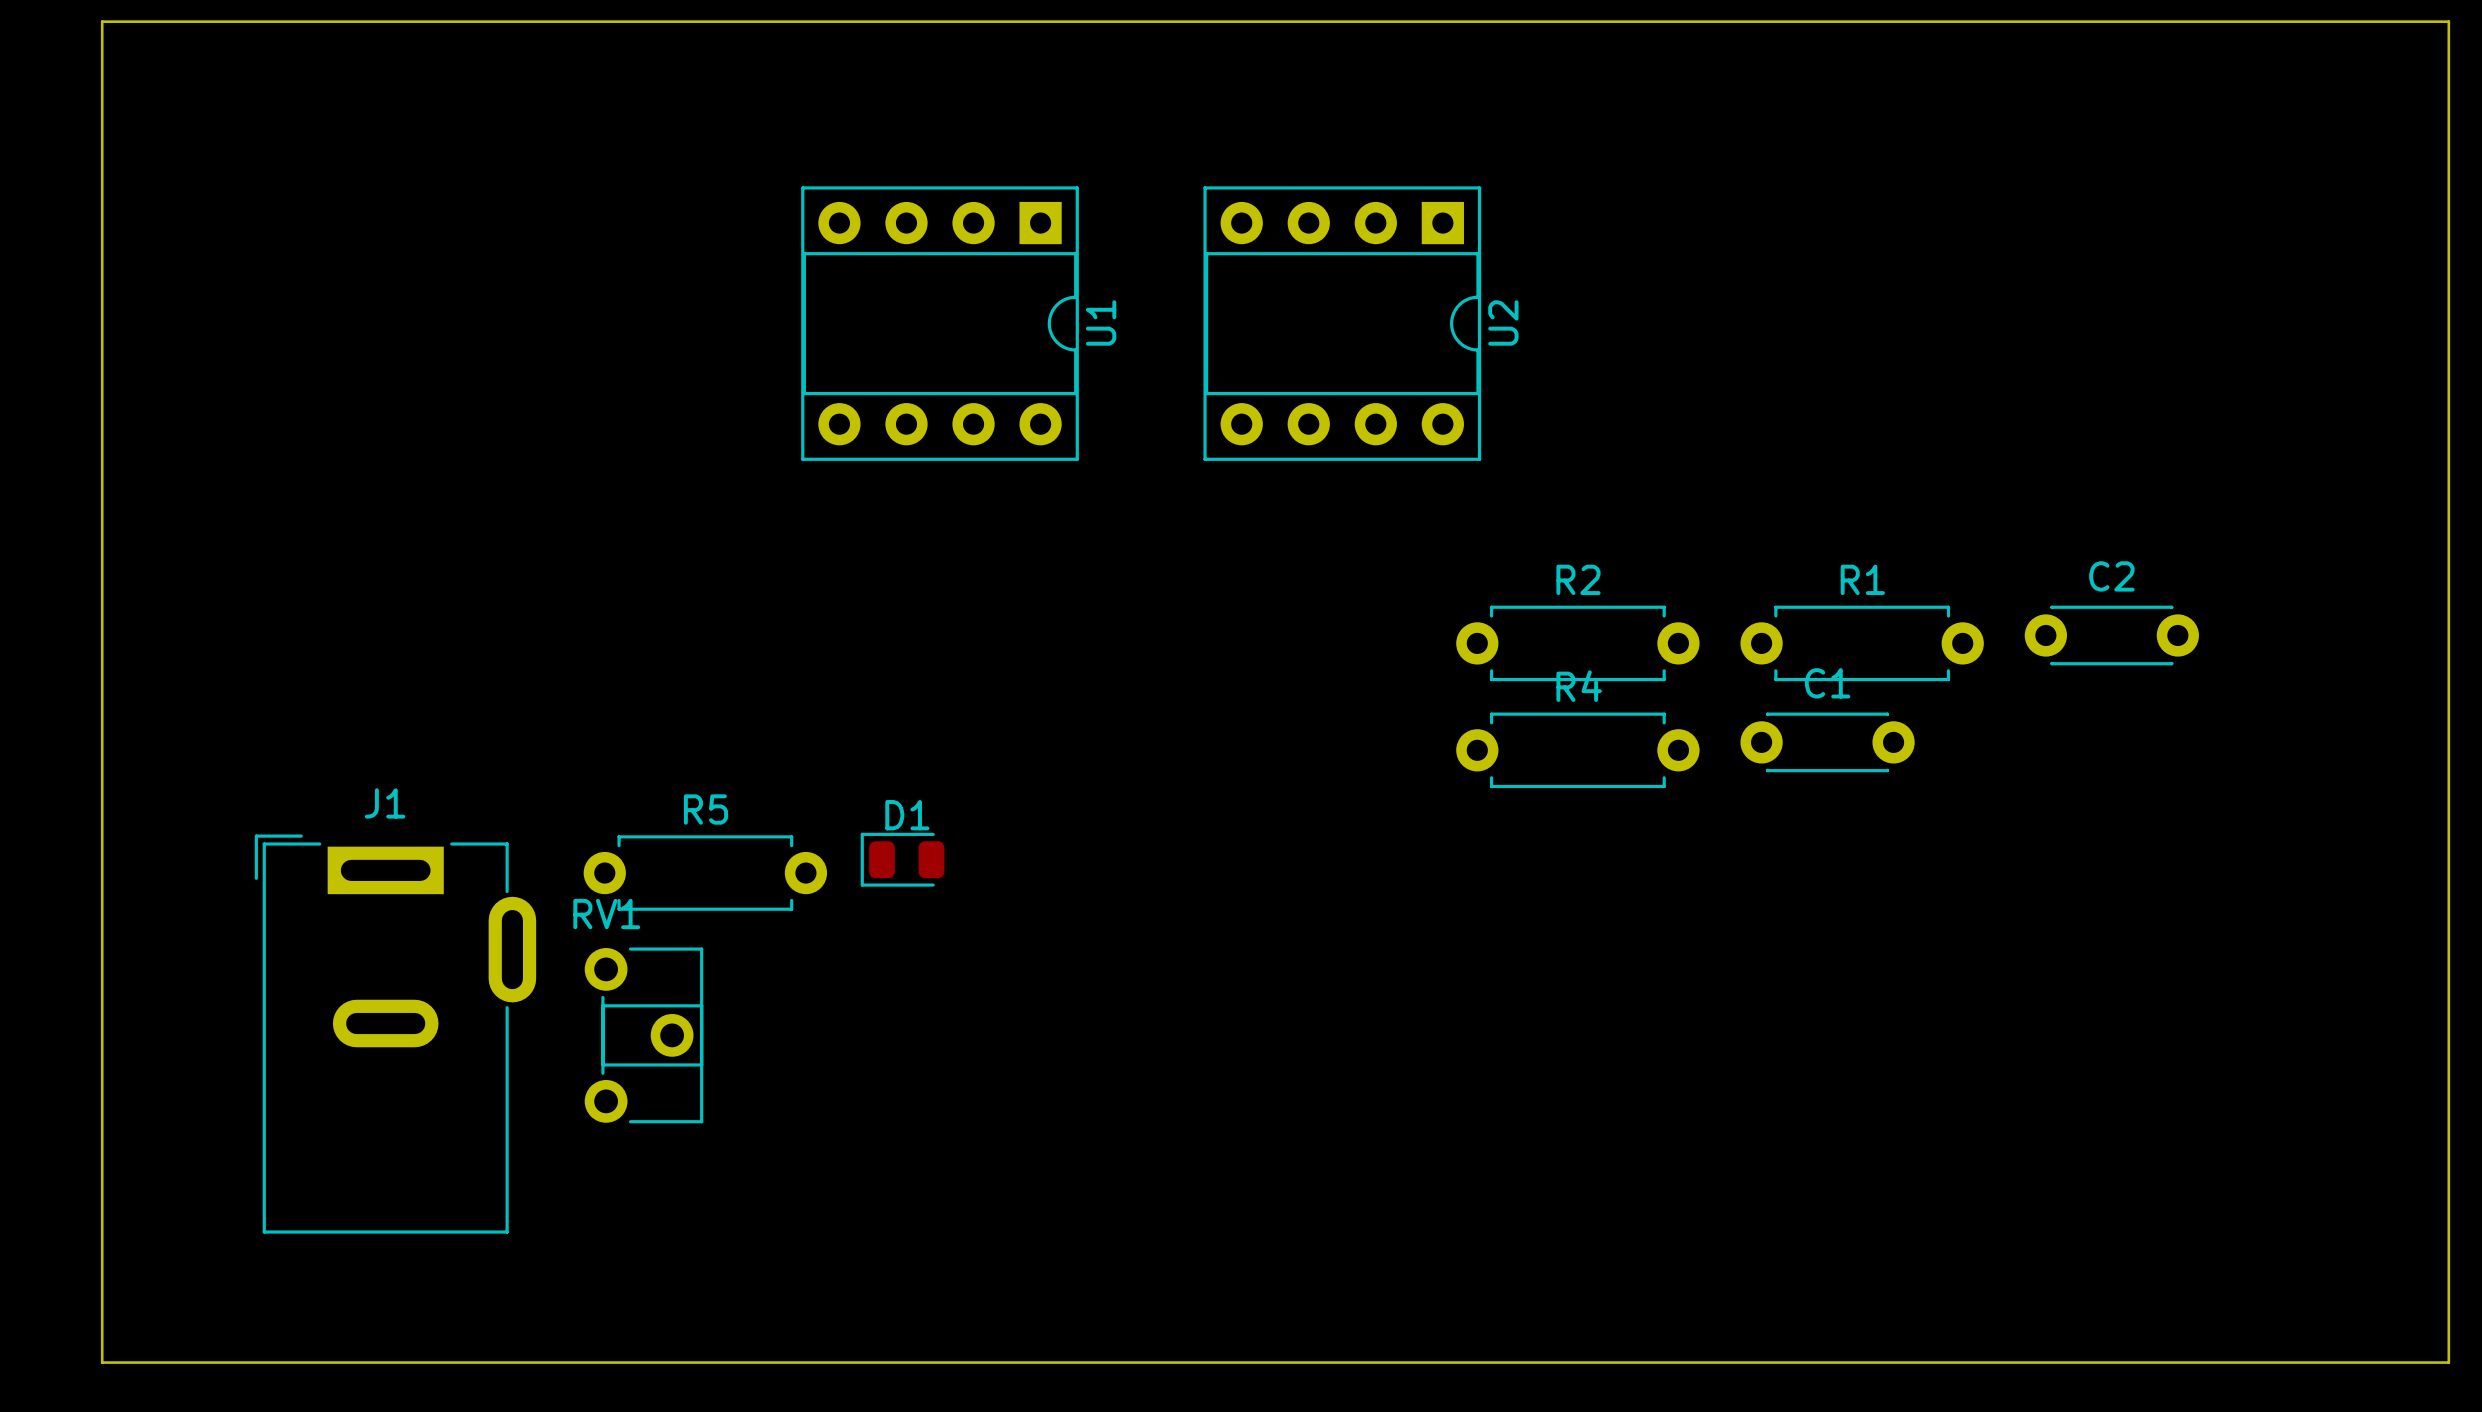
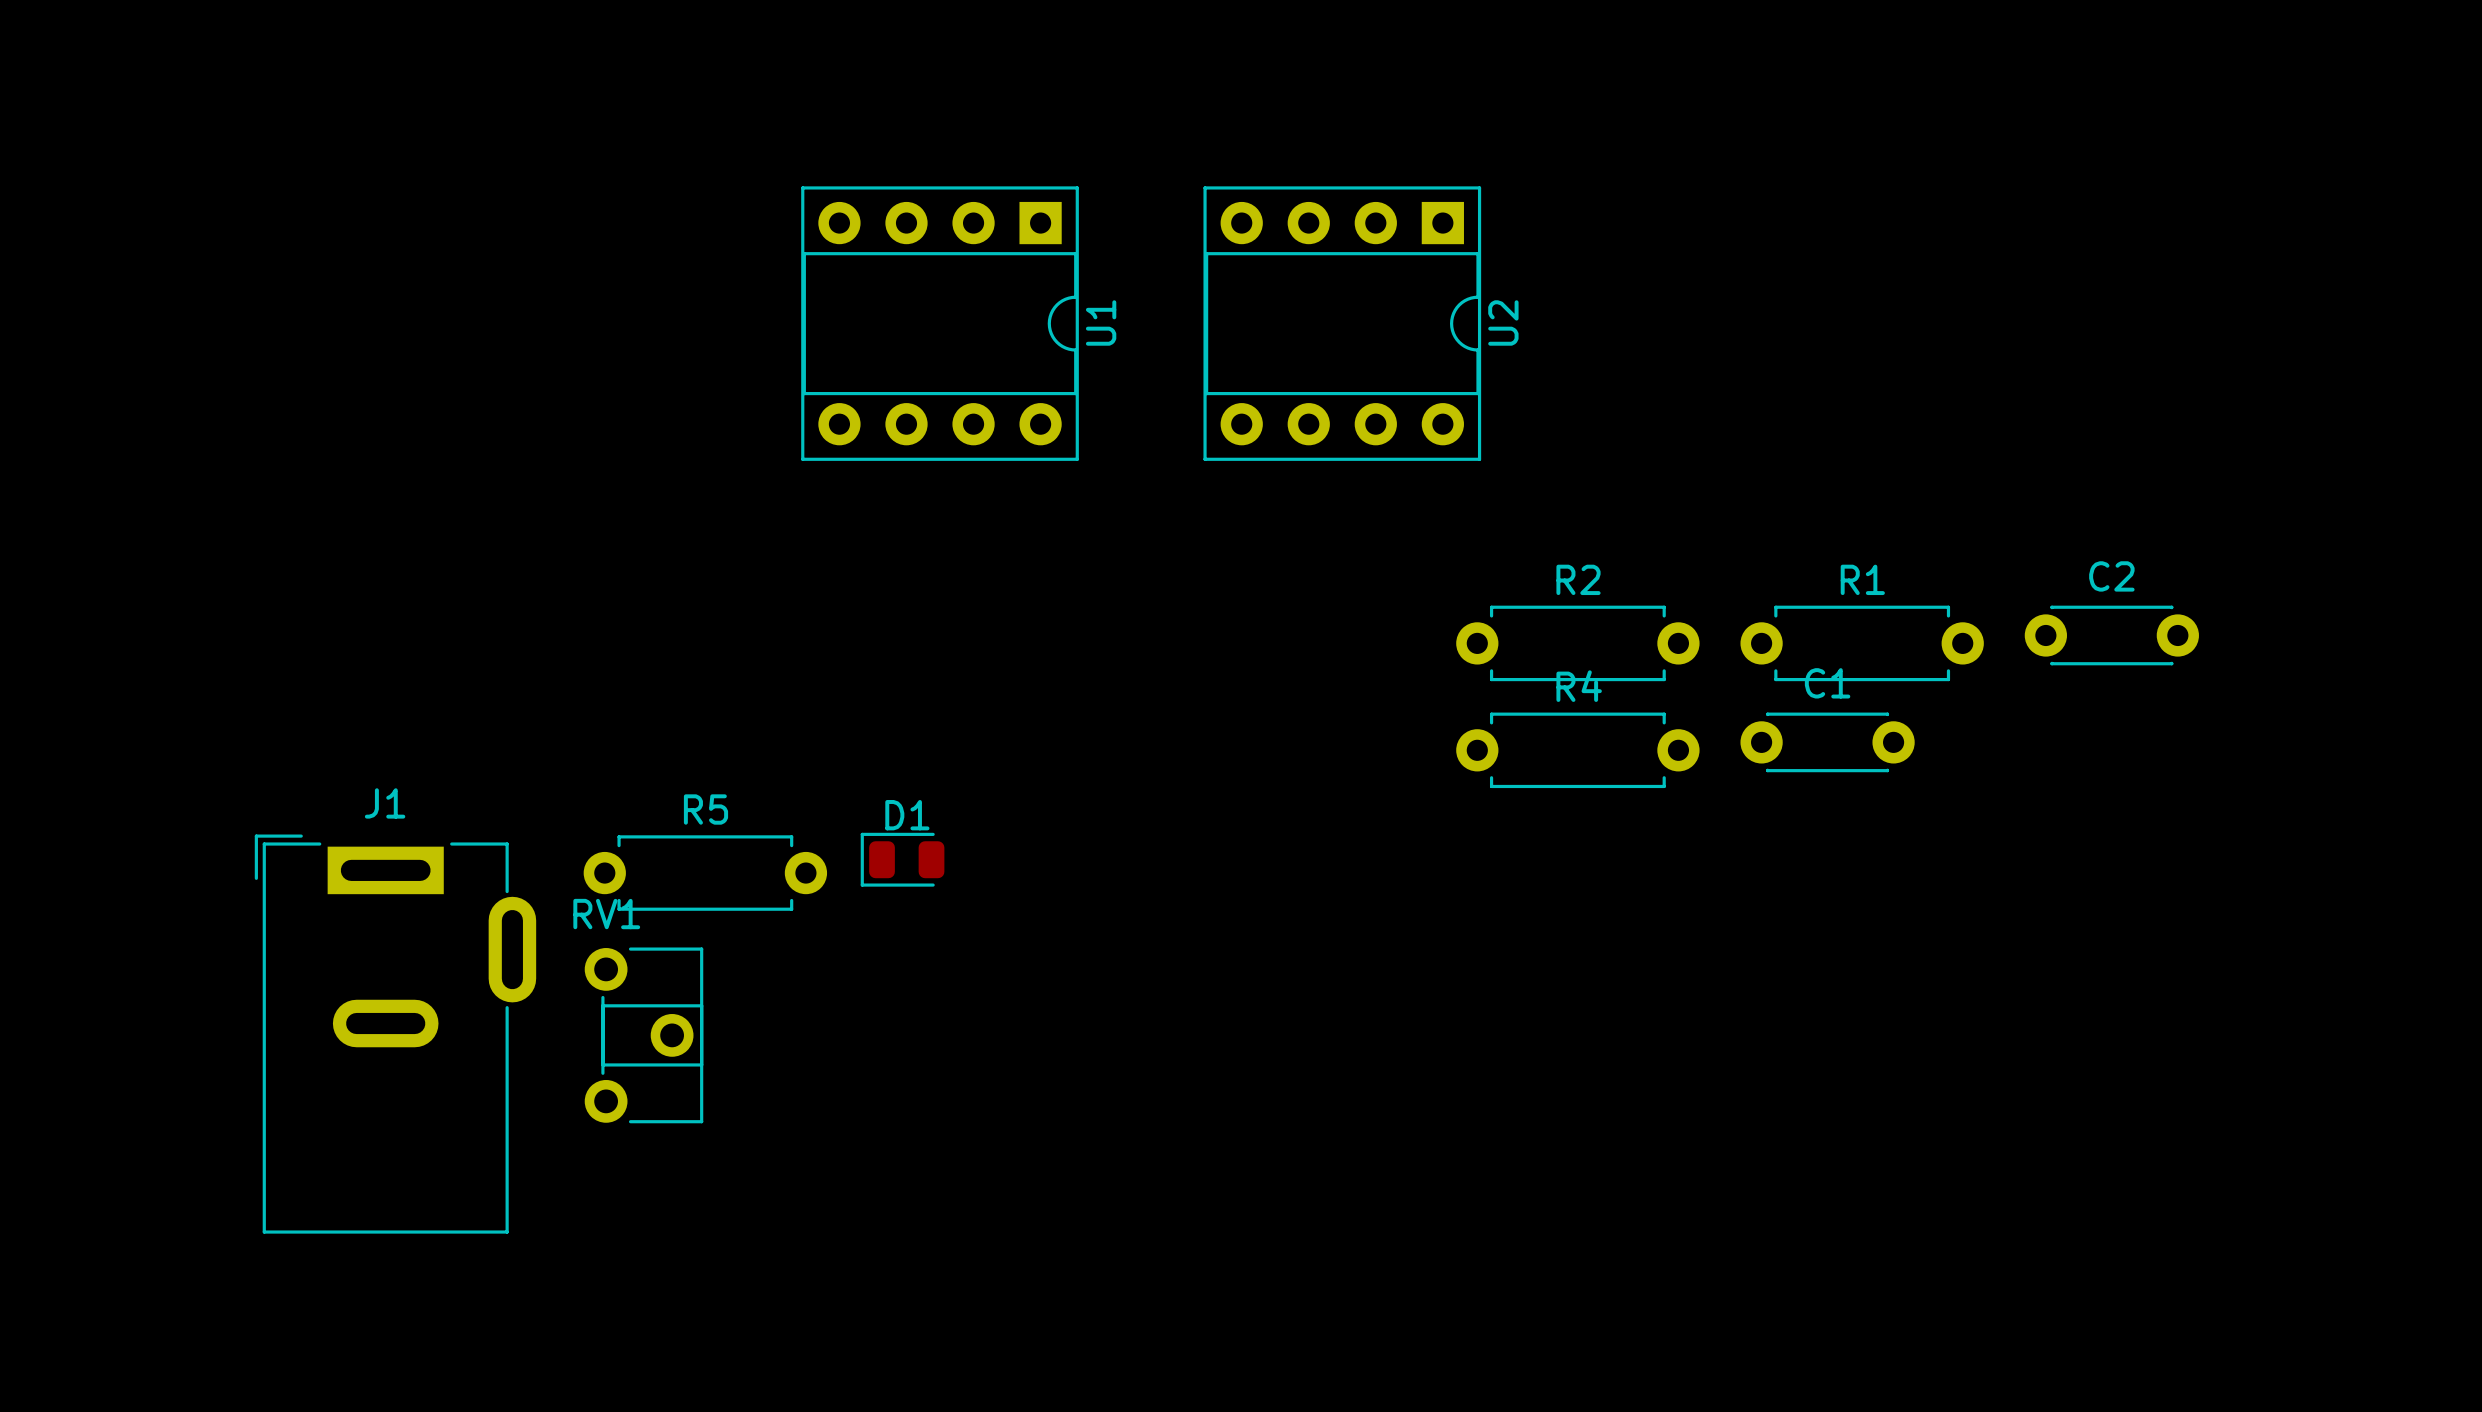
board edge: (102, 21) (2448, 21) (2448, 1362) (102, 1362) (102, 21) -> none

